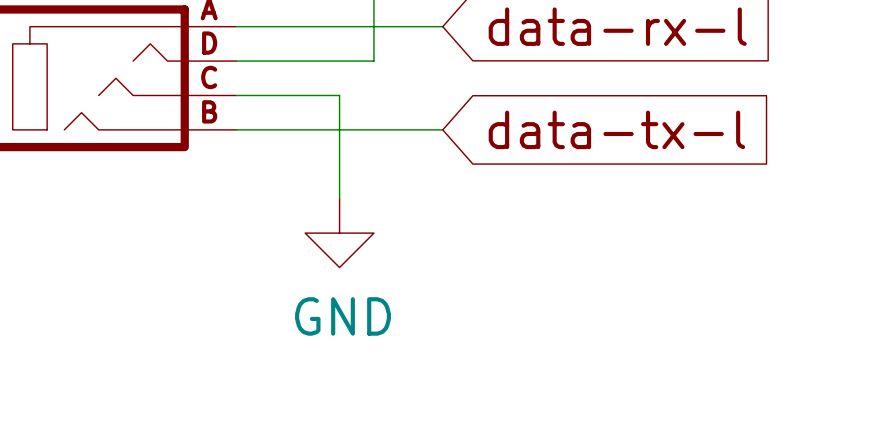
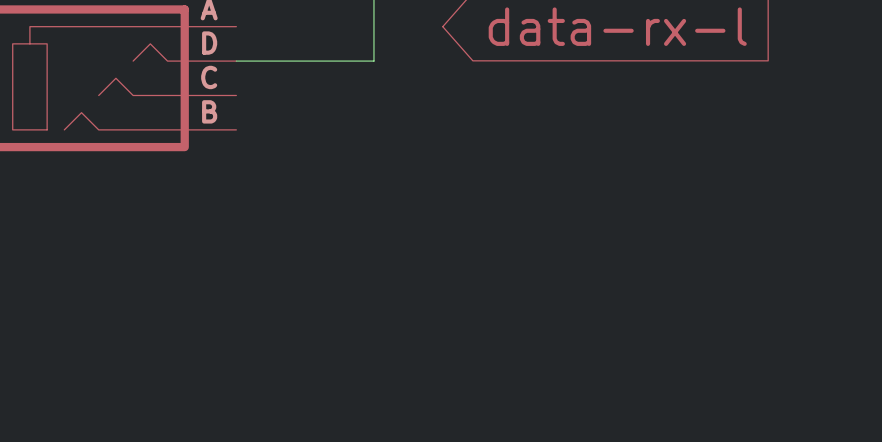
wire: (236, 26) (442, 26) -> none
wire: (236, 95) (339, 95) (339, 198) -> none
wire: (236, 129) (442, 129) -> none
global label: data-tx-l (616, 129) -> none
power symbol: GND (339, 233) -> none

